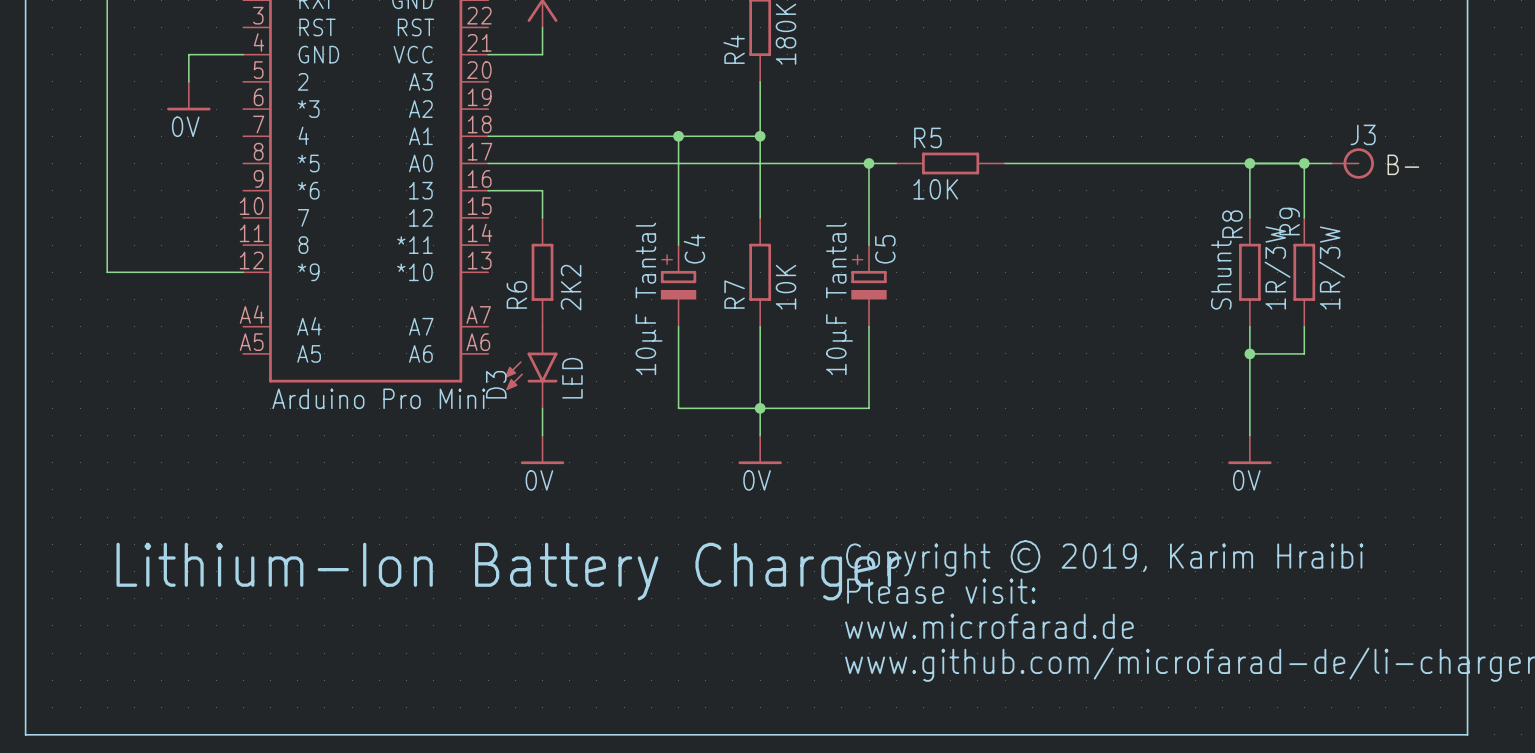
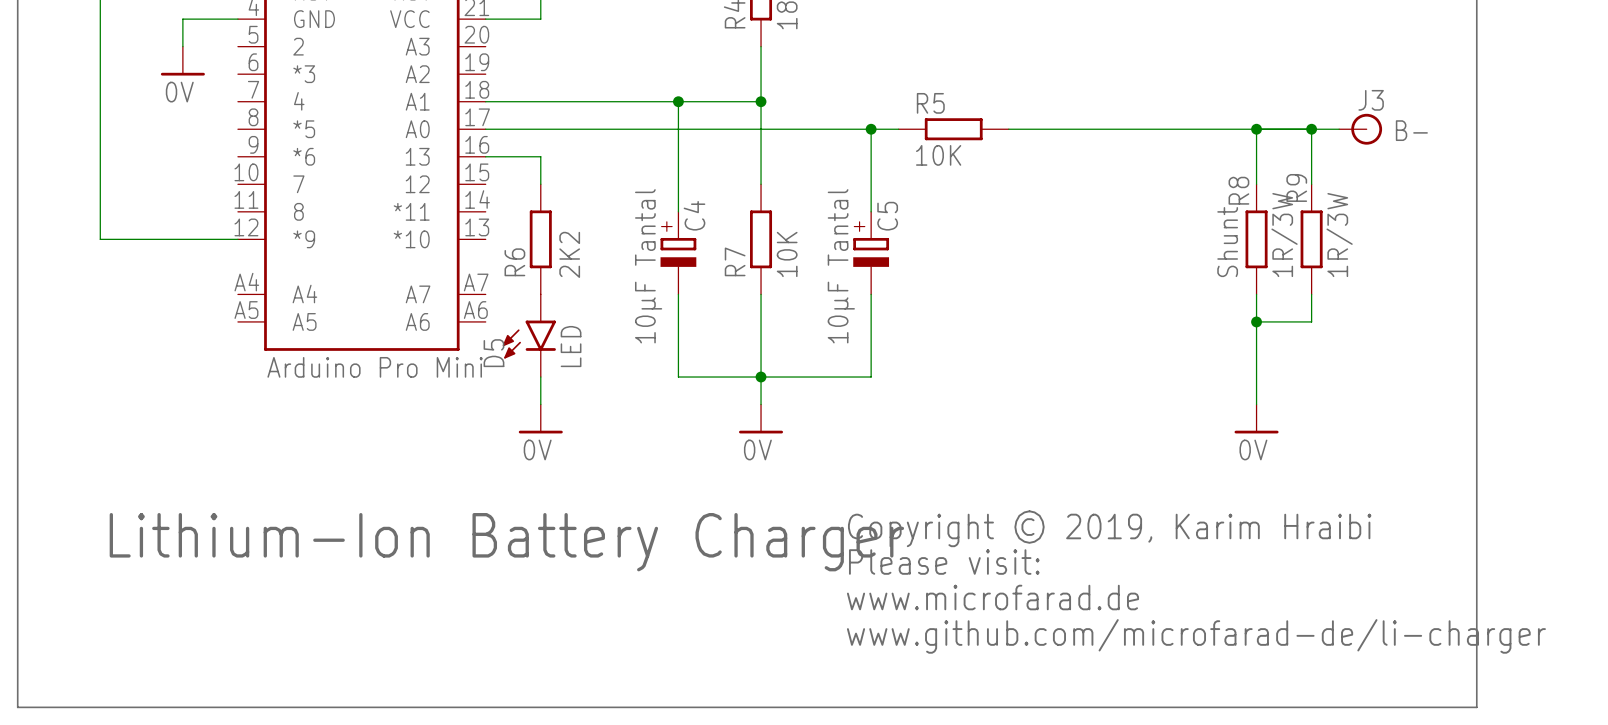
D3 name: D3 (496, 384) -> D5 (493, 353)

